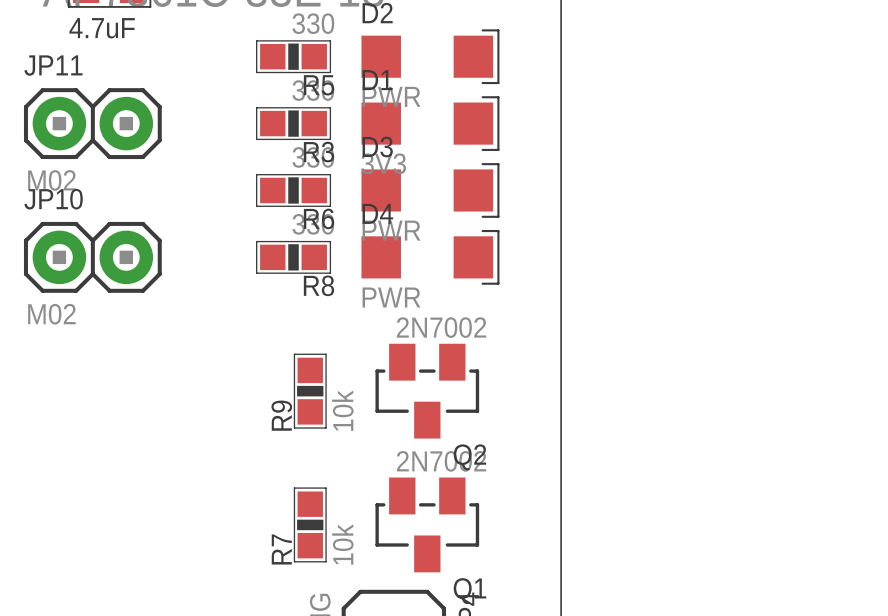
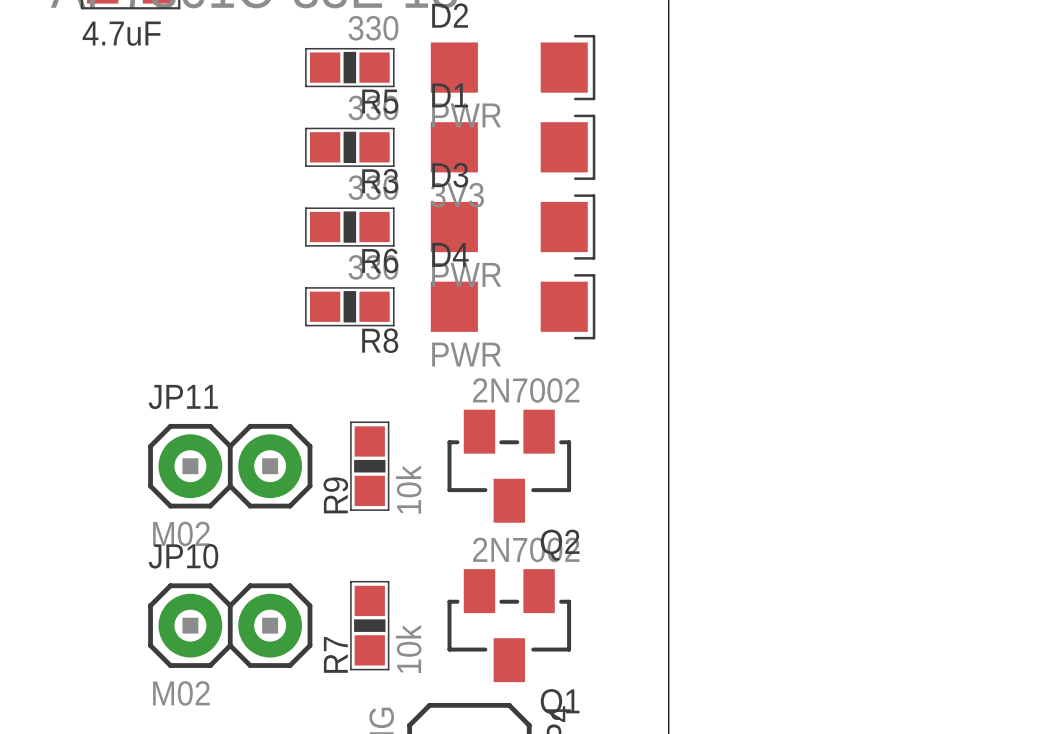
JP11 position: (92, 123) -> (230, 466)
JP10 position: (92, 257) -> (230, 625)

